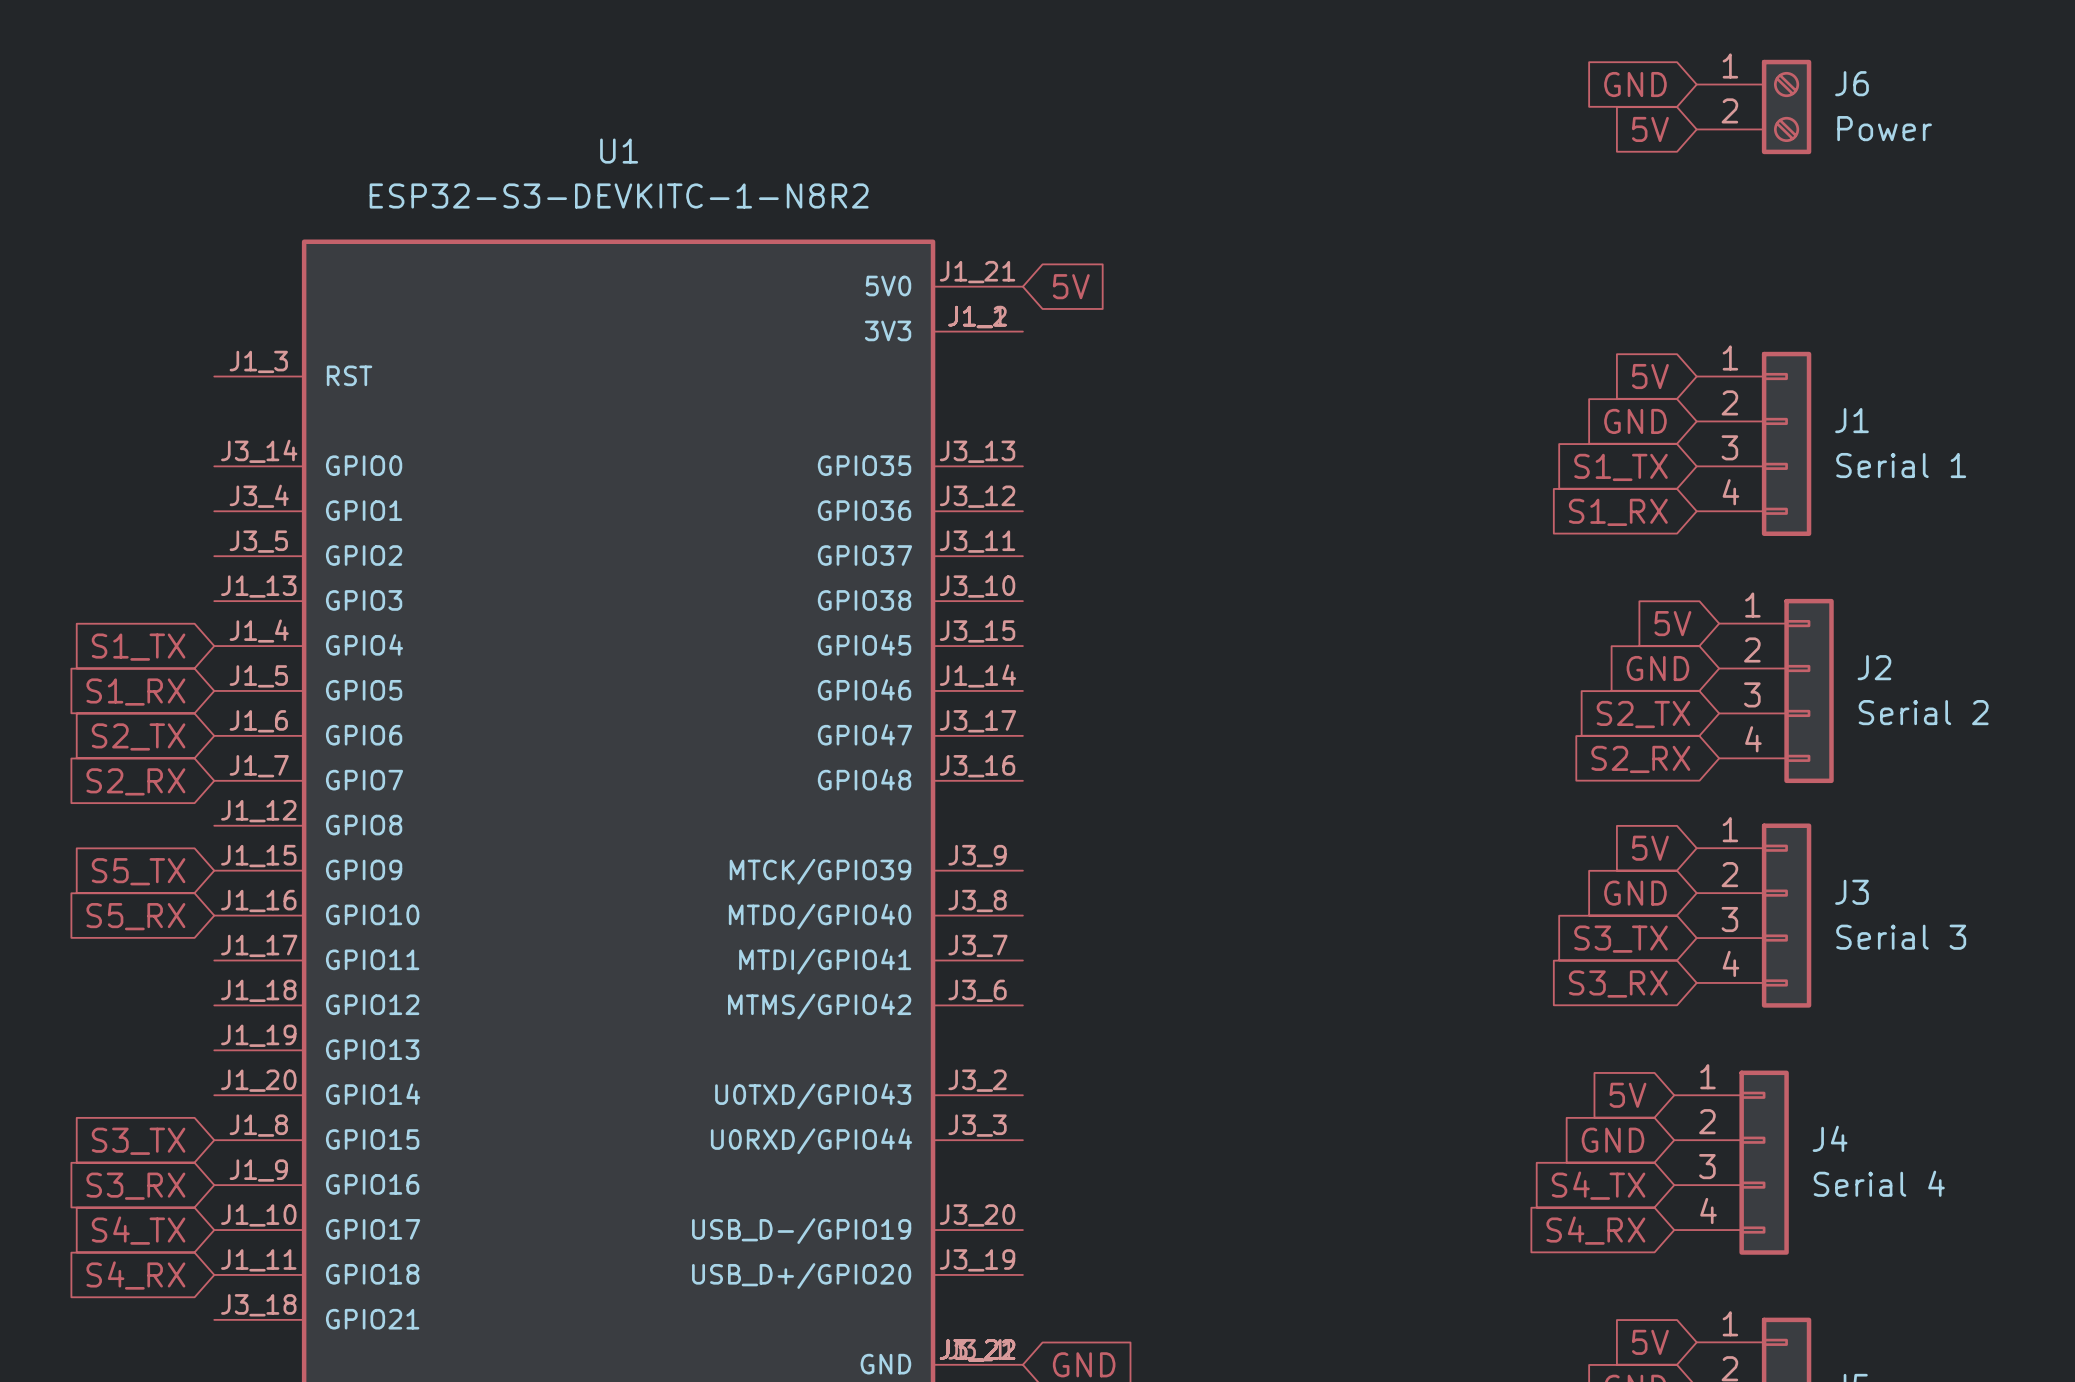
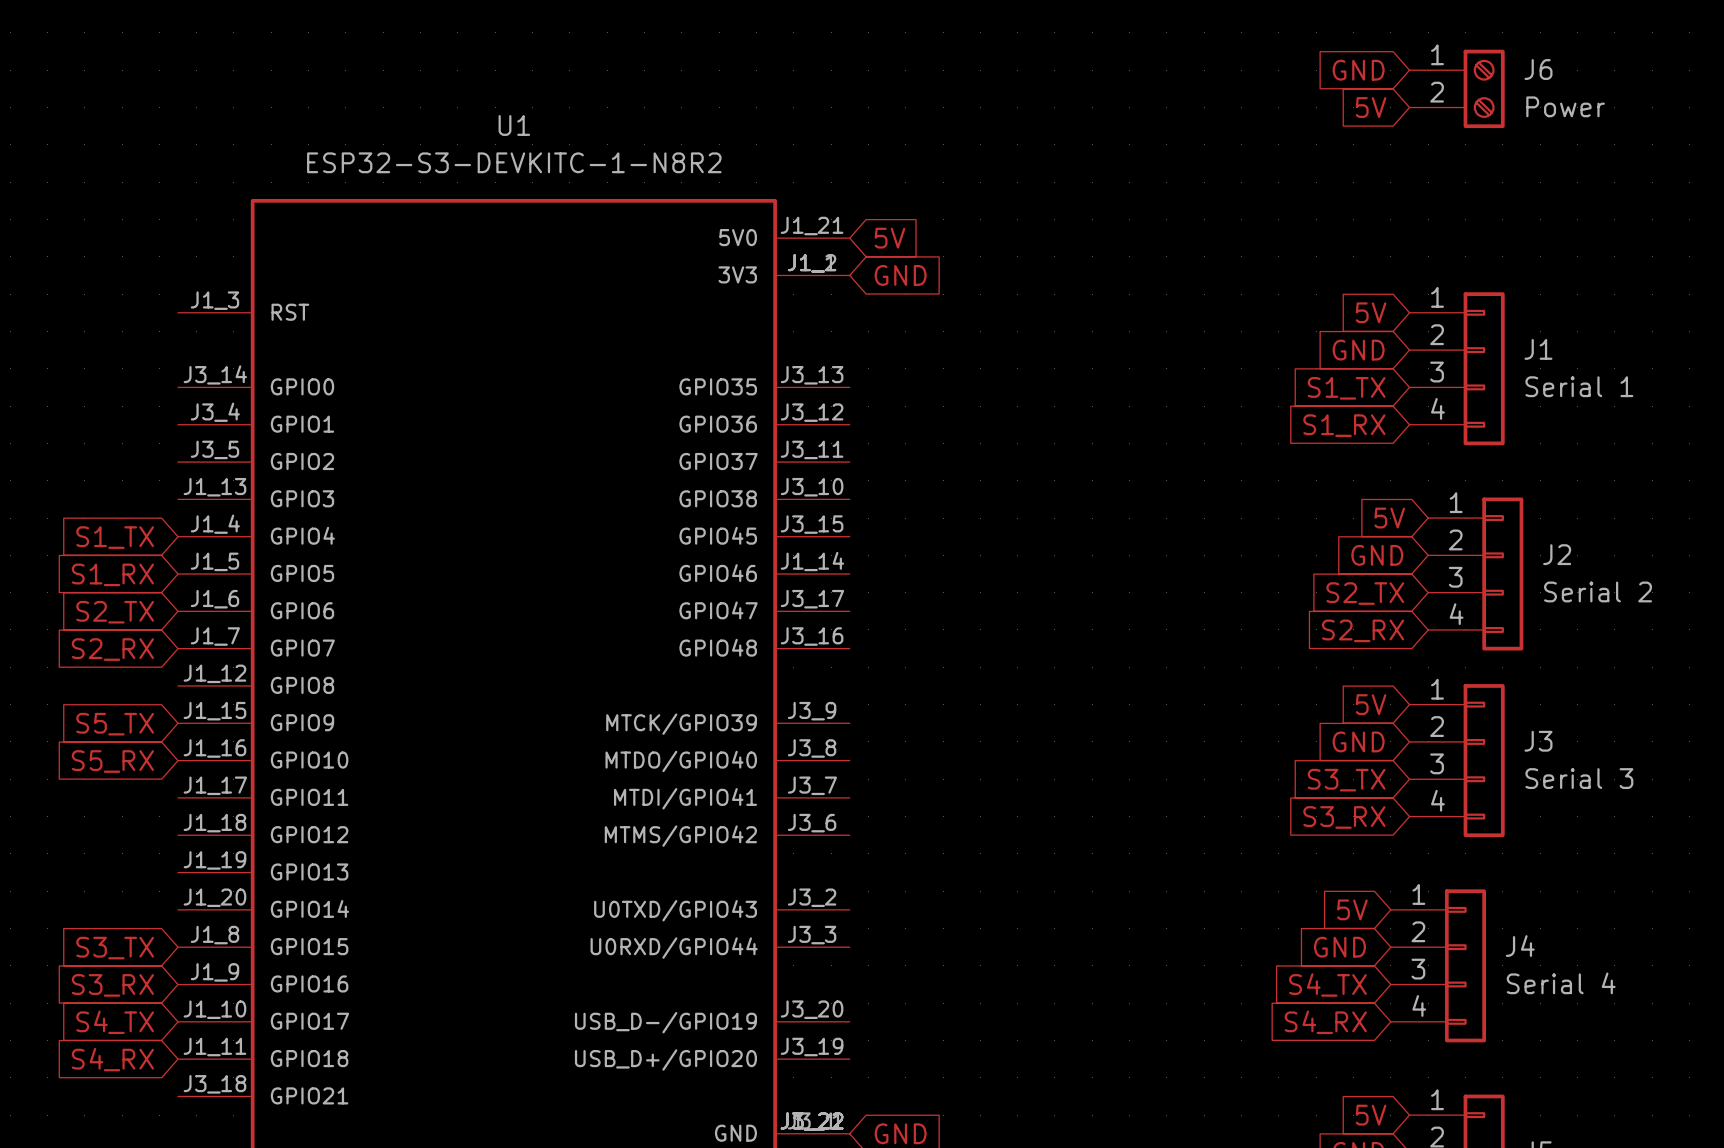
global label: none -> GND (900, 275)

